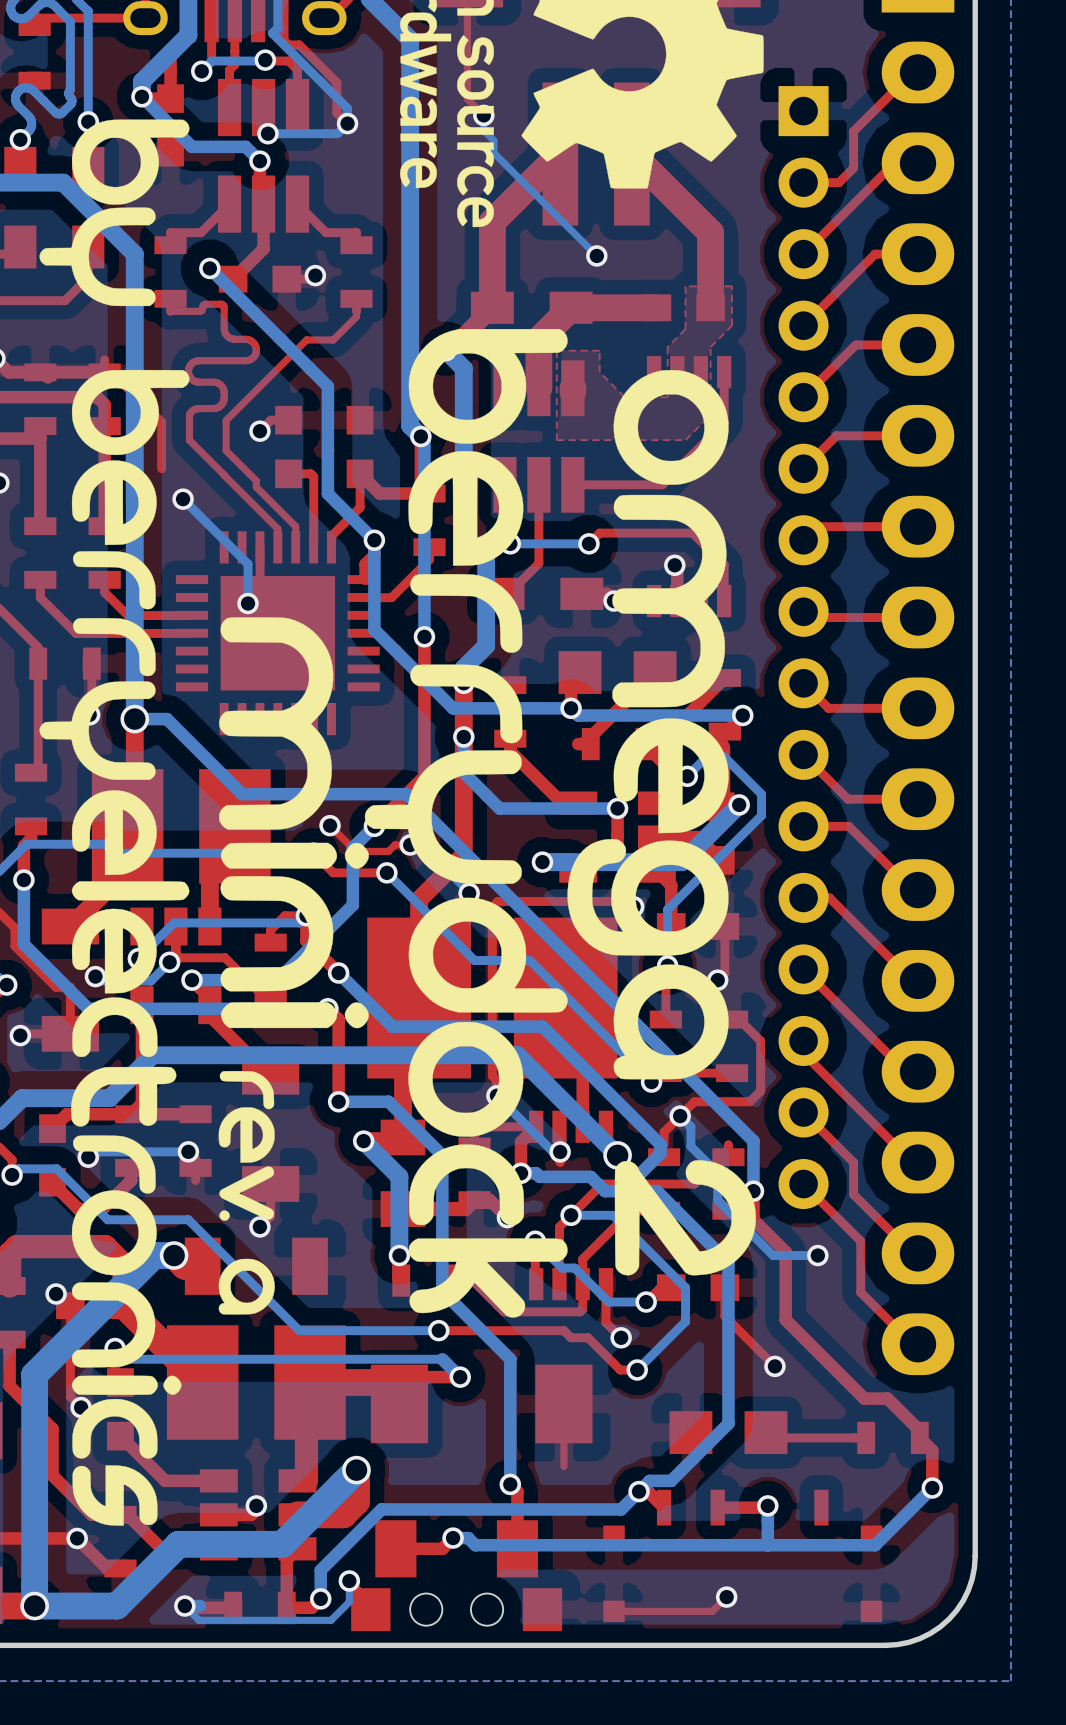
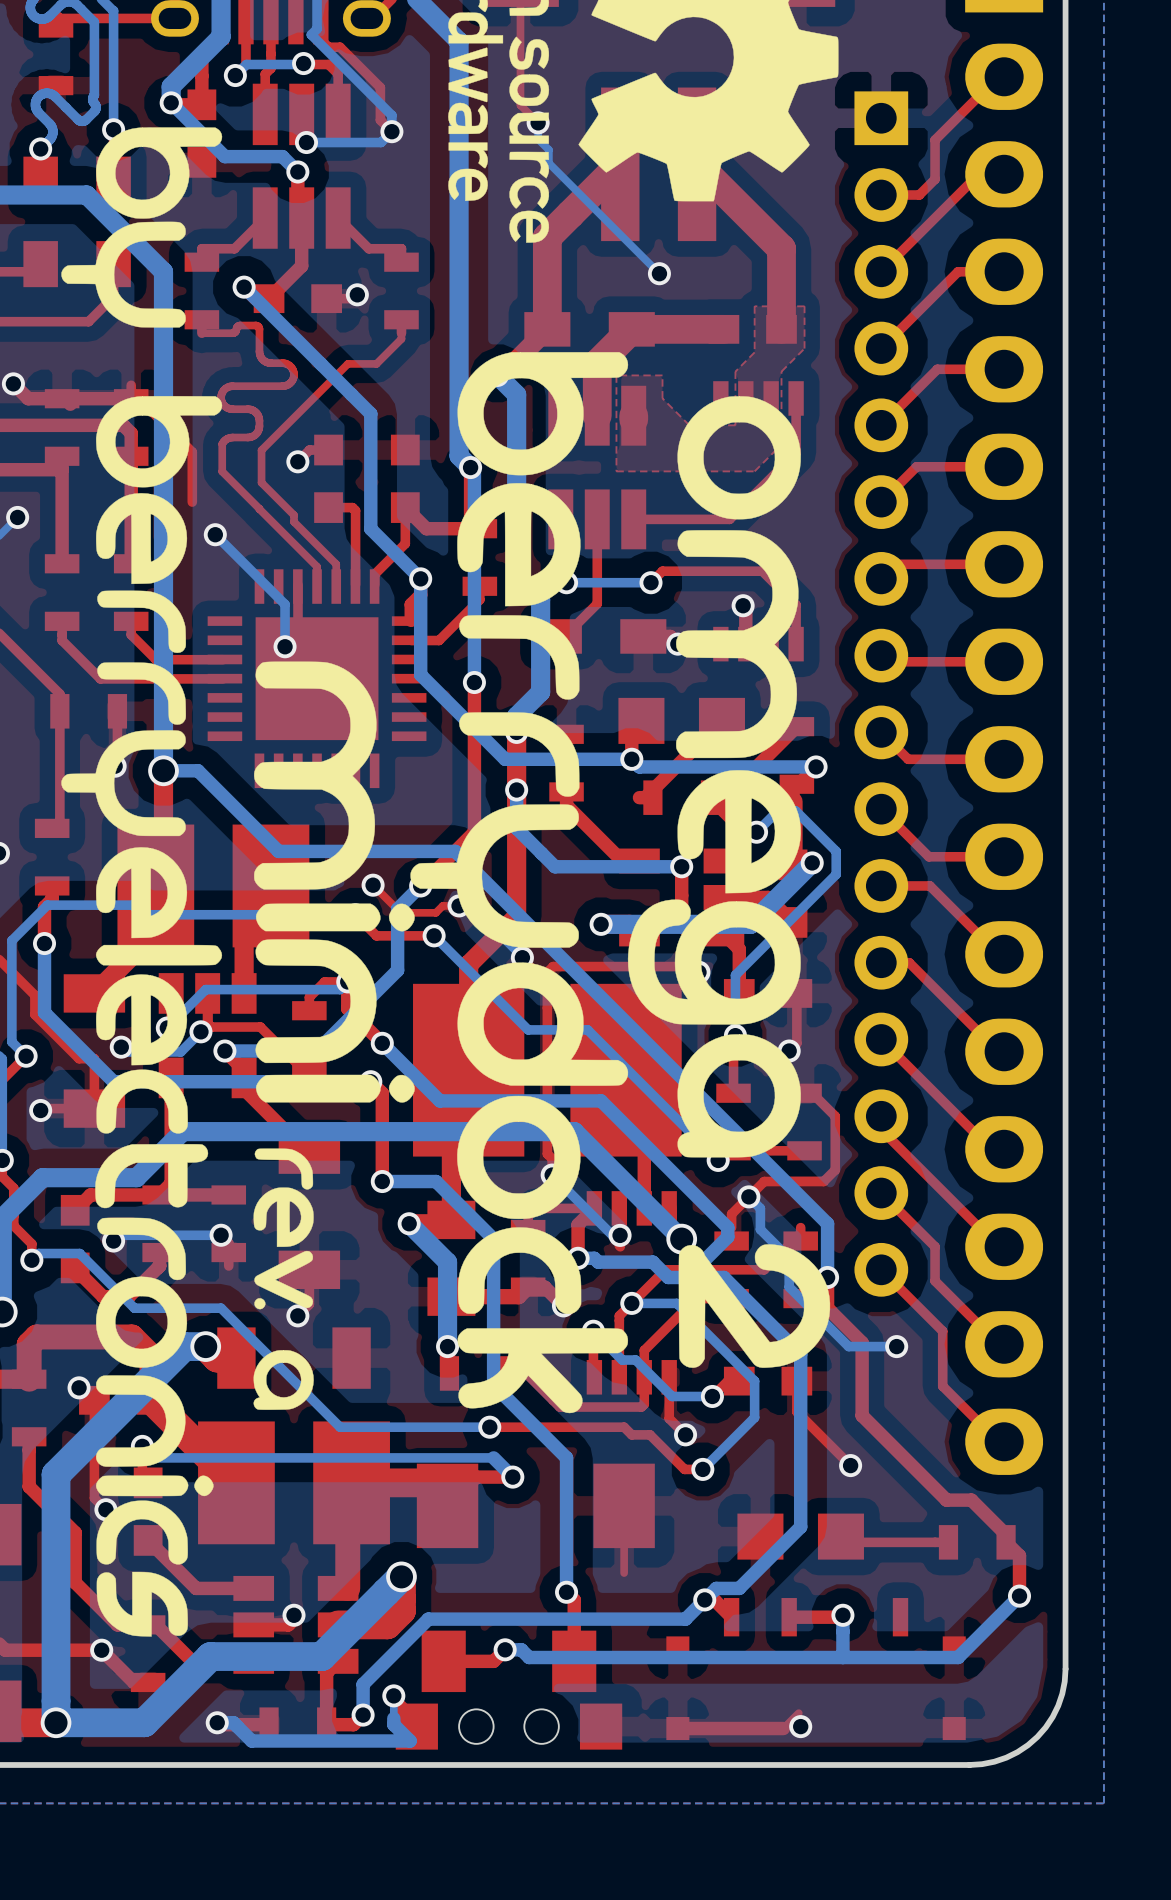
via position: (726, 1597) -> (800, 1726)
bottom track: (349, 1602) (331, 1620) (199, 1620) (184, 1606) -> (393, 1718) (393, 1724) (410, 1741) (251, 1741) (233, 1722)
top track width: thin (712, 1611) (614, 1611) -> thick (783, 1728) (677, 1728)

